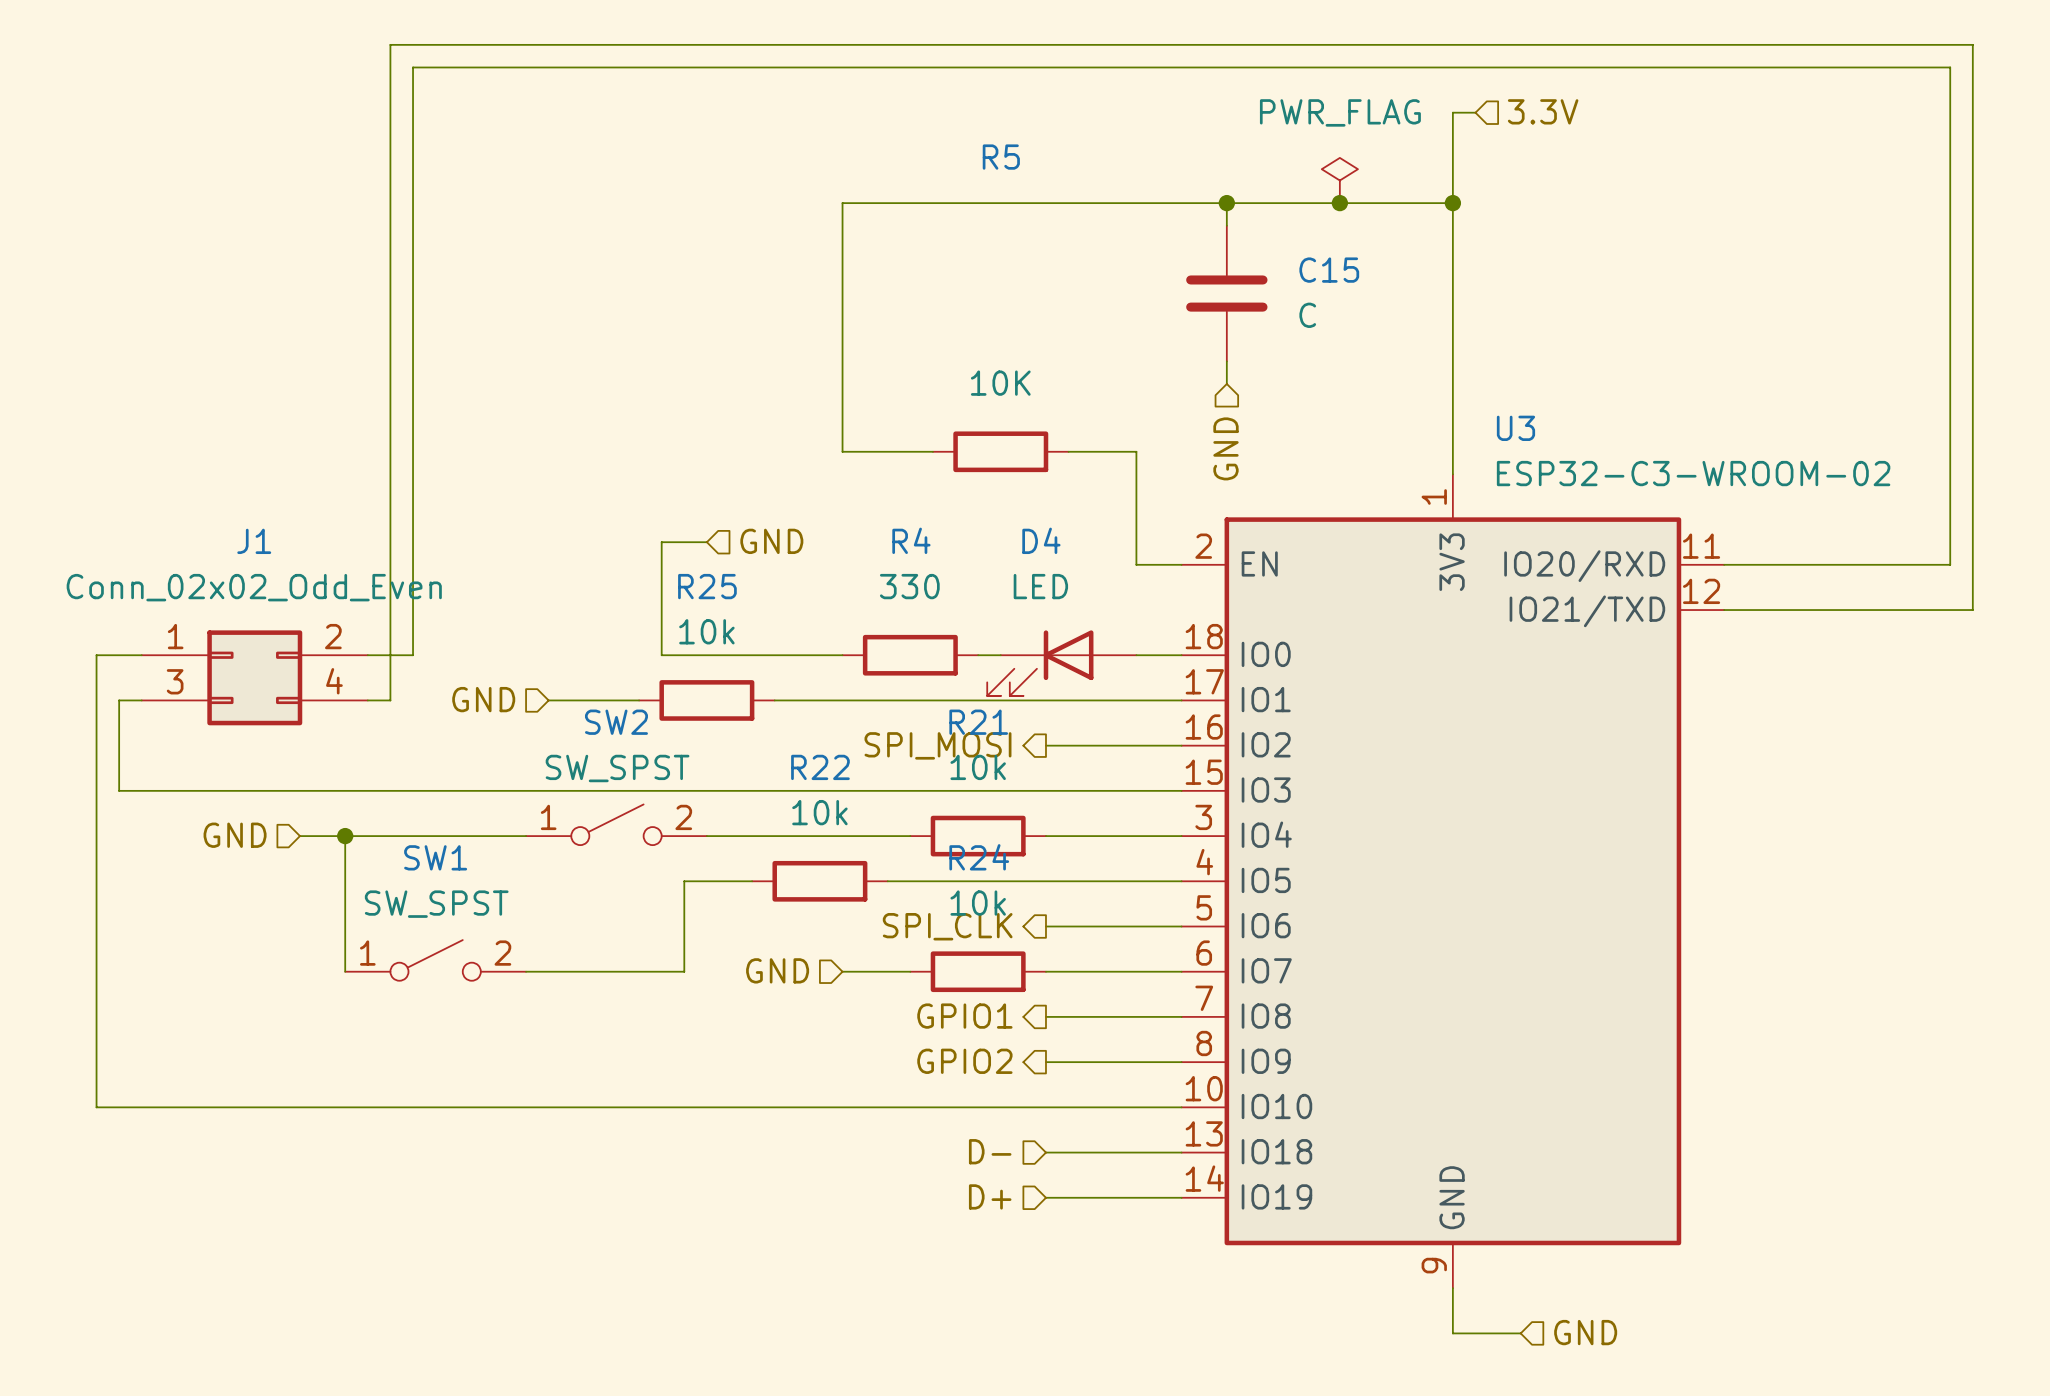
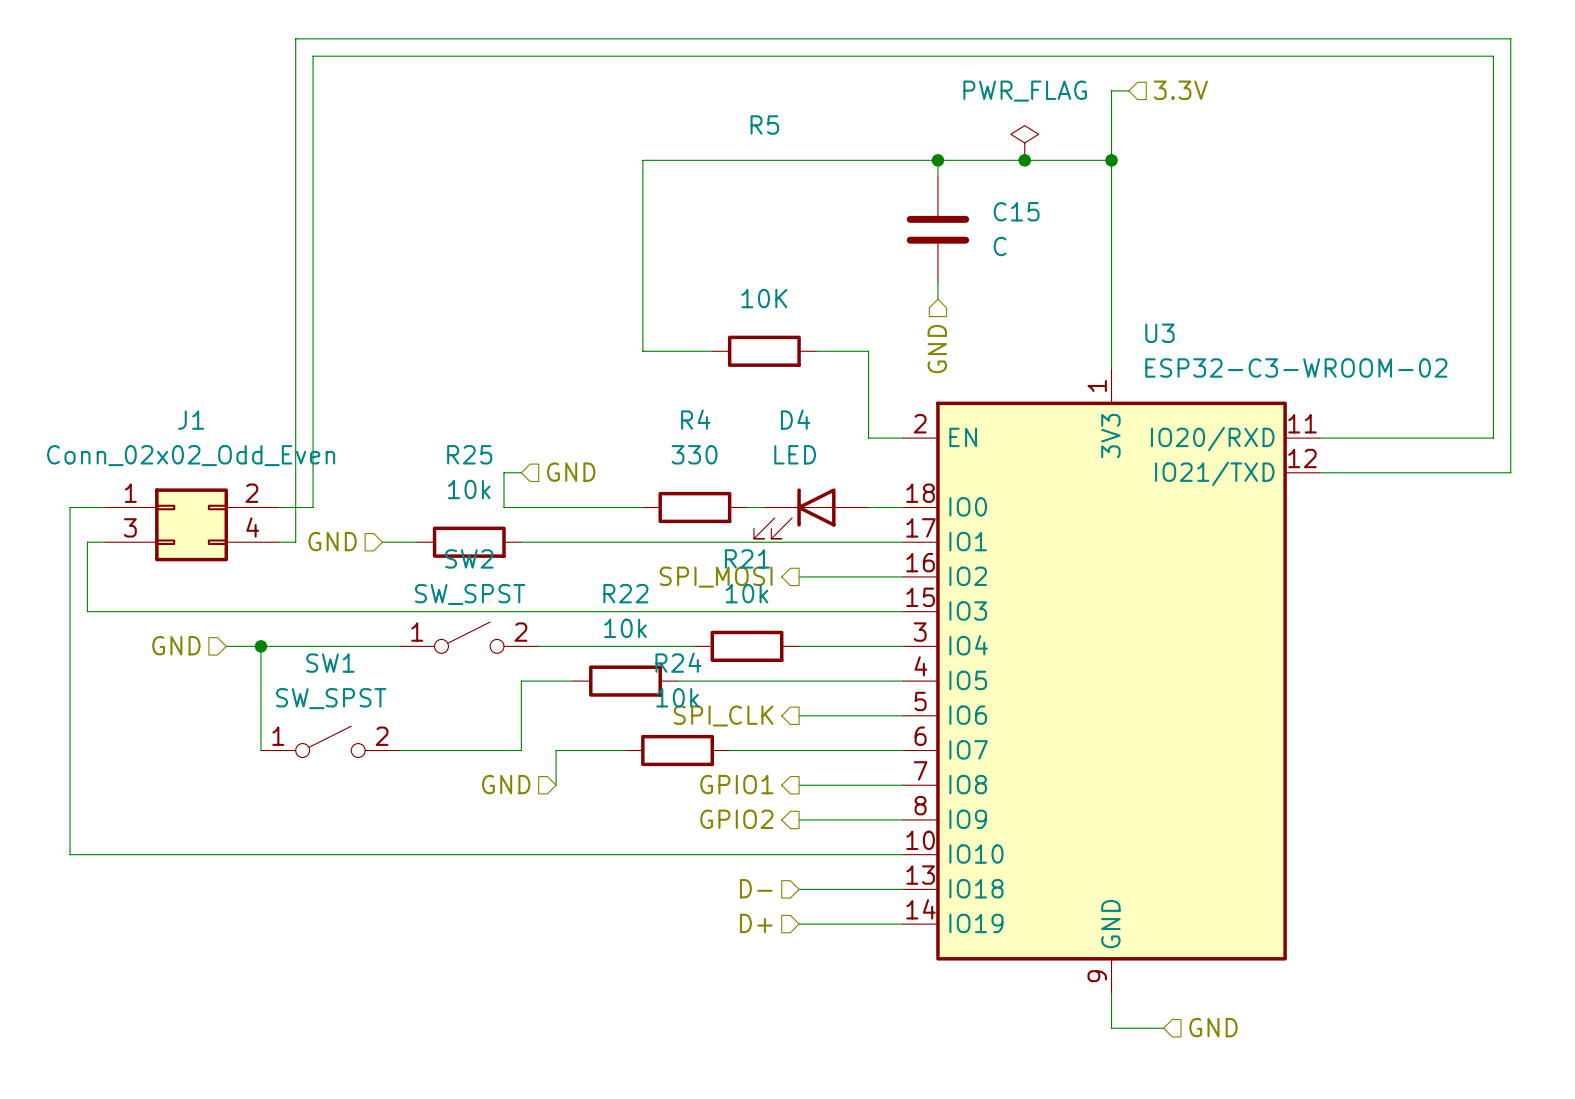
hierarchical label position: GND (771, 541) -> GND (571, 472)
wire: (706, 542) (661, 542) (661, 610) -> (521, 472) (503, 472)
hierarchical label position: GND (483, 699) -> GND (332, 541)
wire: (548, 700) (639, 700) -> (417, 542) (382, 542)
wire: none -> (521, 542) (590, 542)
R25 position: (706, 700) -> (469, 542)
hierarchical label position: GND (777, 970) -> GND (506, 784)
wire: none -> (625, 750) (556, 750) (556, 785)
wire: (842, 971) (910, 971) -> none
wire: none -> (729, 750) (799, 750)
R24 position: (978, 971) -> (677, 750)

